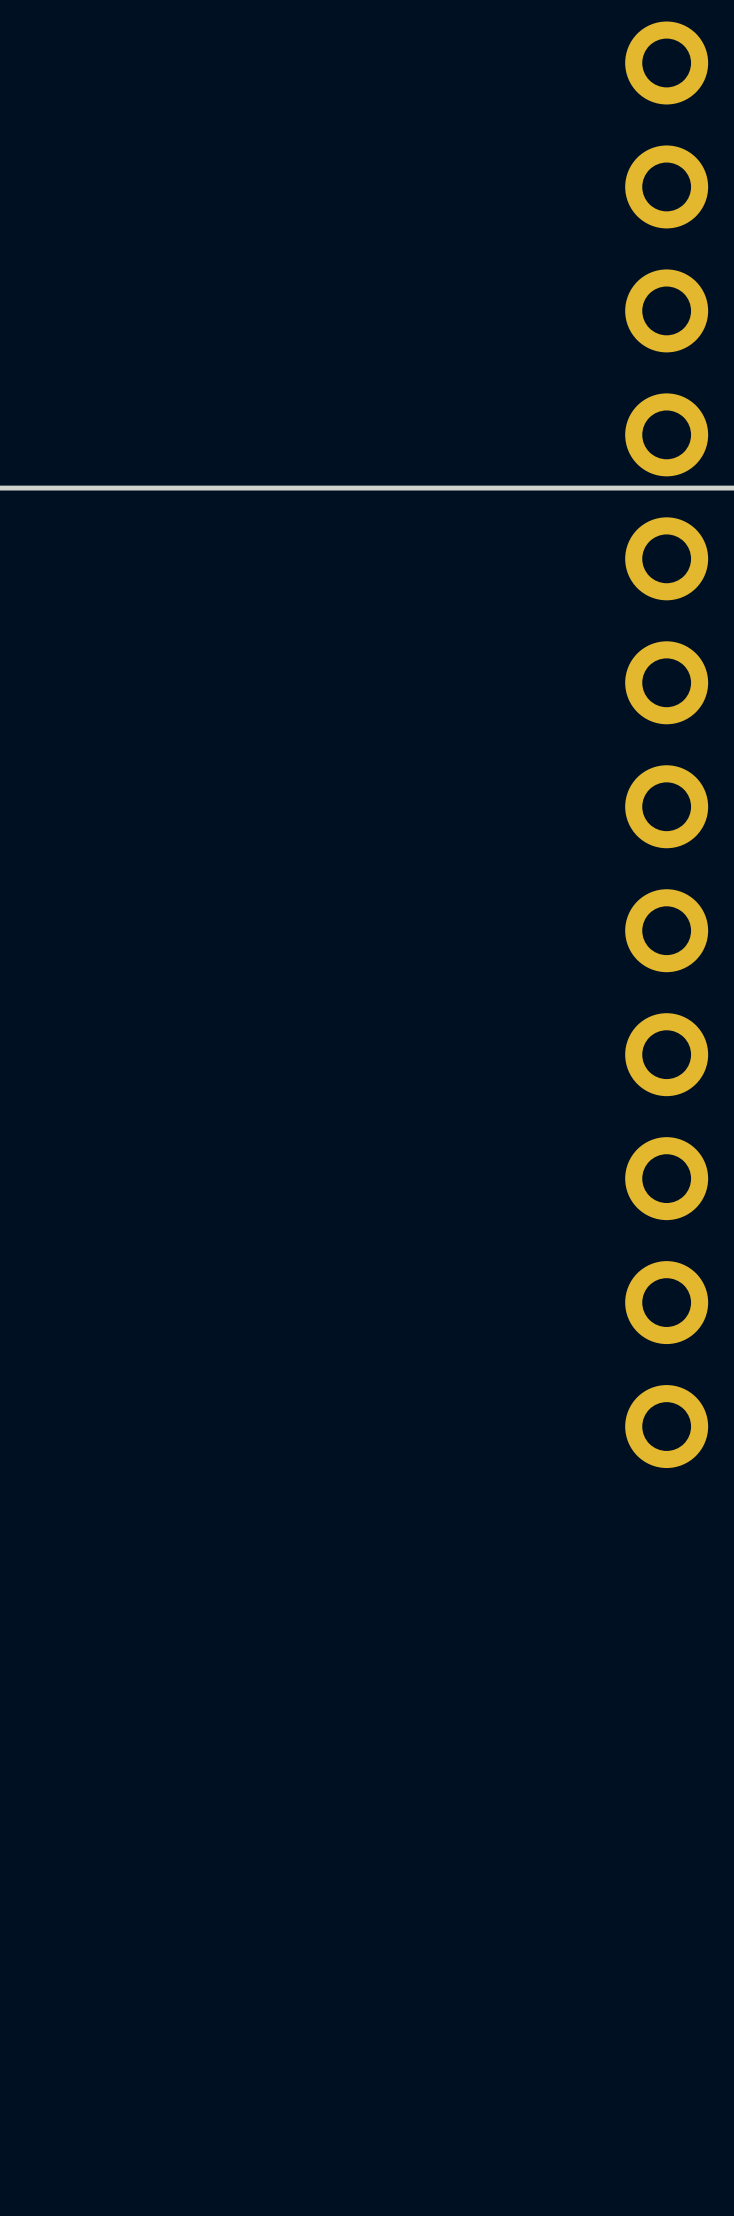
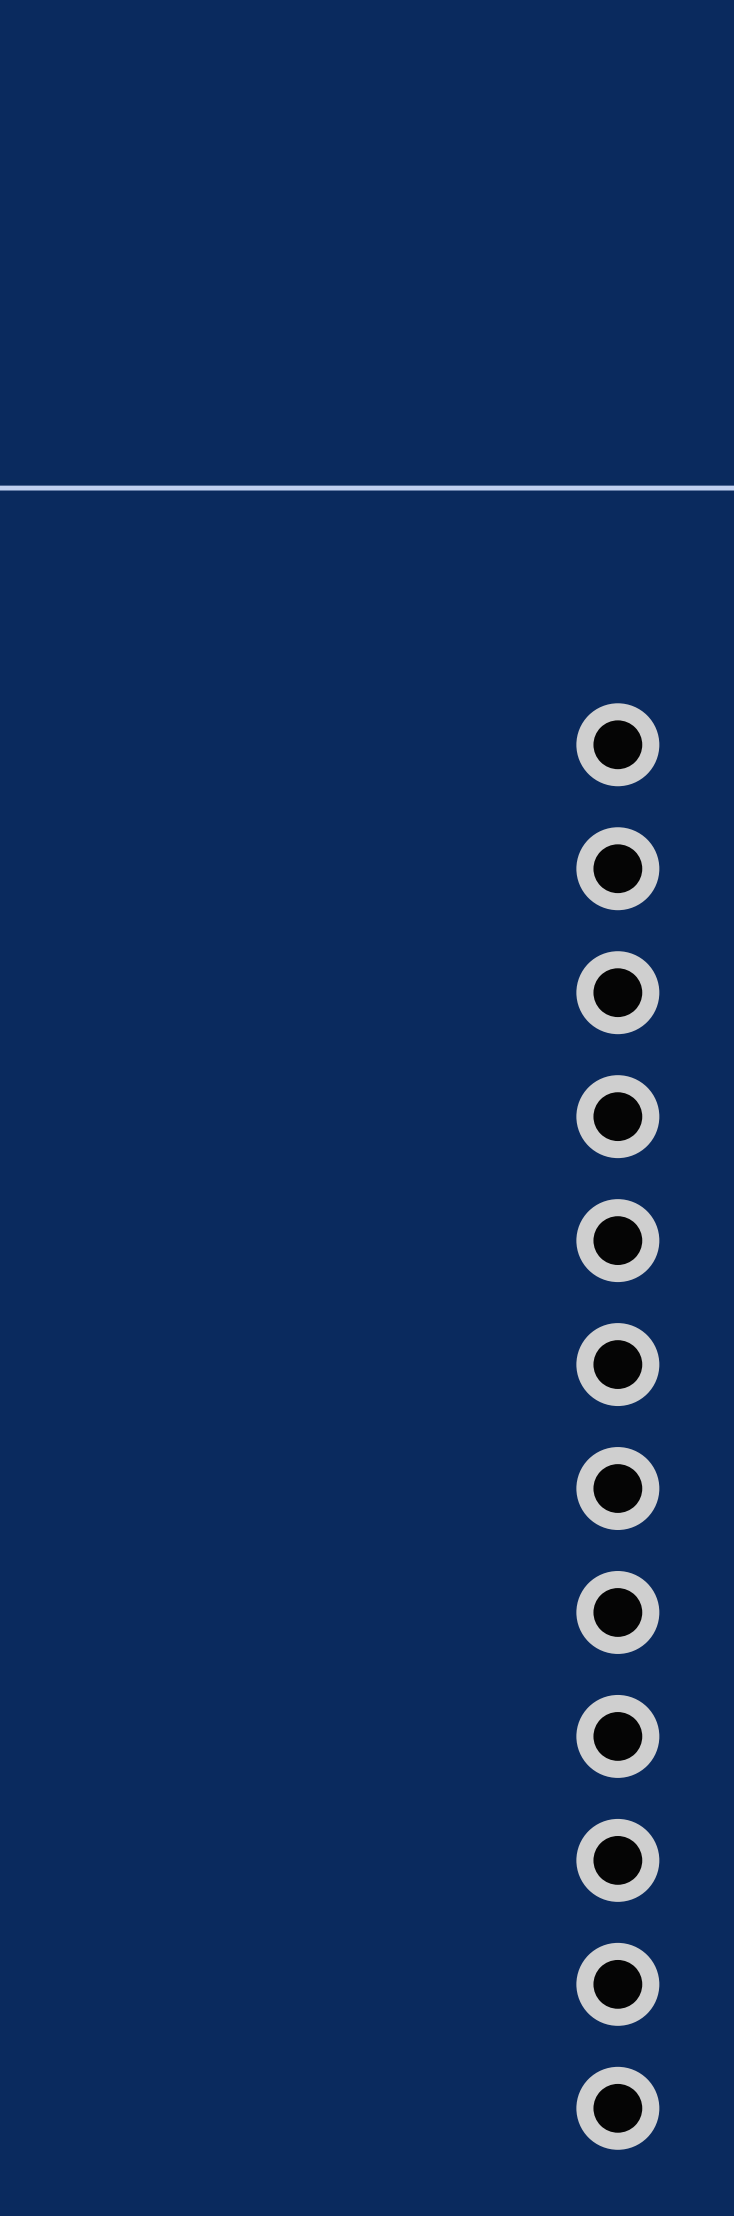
part footprint: [625, 21, 709, 1469] -> [576, 703, 660, 787]
part: none -> (617, 868)
part: none -> (617, 992)
part: none -> (617, 1116)
part: none -> (617, 1240)
part: none -> (617, 1364)
part: none -> (617, 1488)
part: none -> (617, 1612)
part: none -> (617, 1736)
part: none -> (617, 1860)
part: none -> (617, 1984)
part: none -> (617, 2108)

